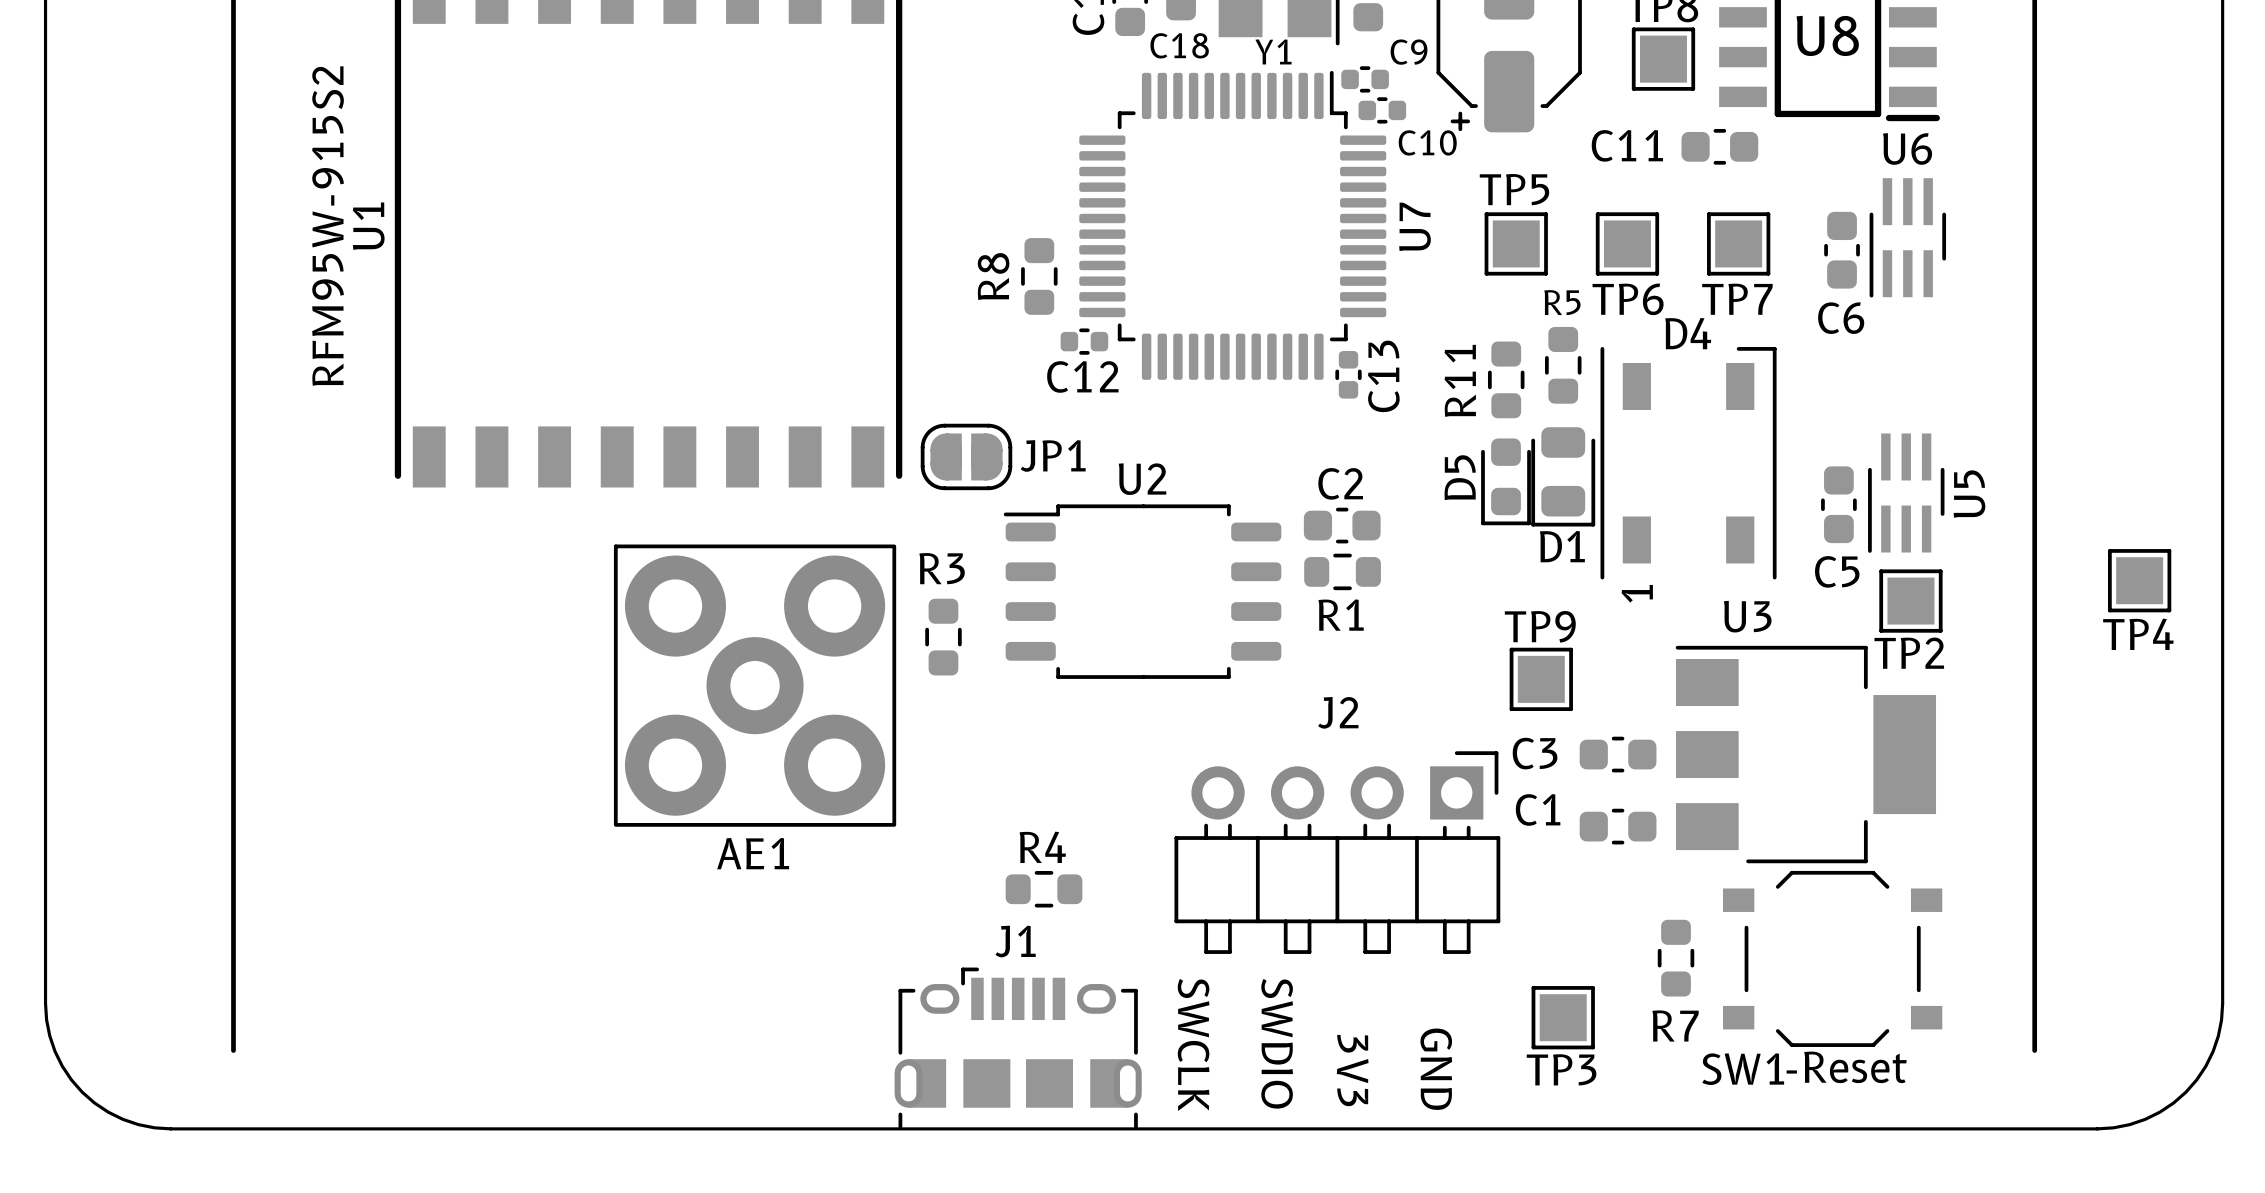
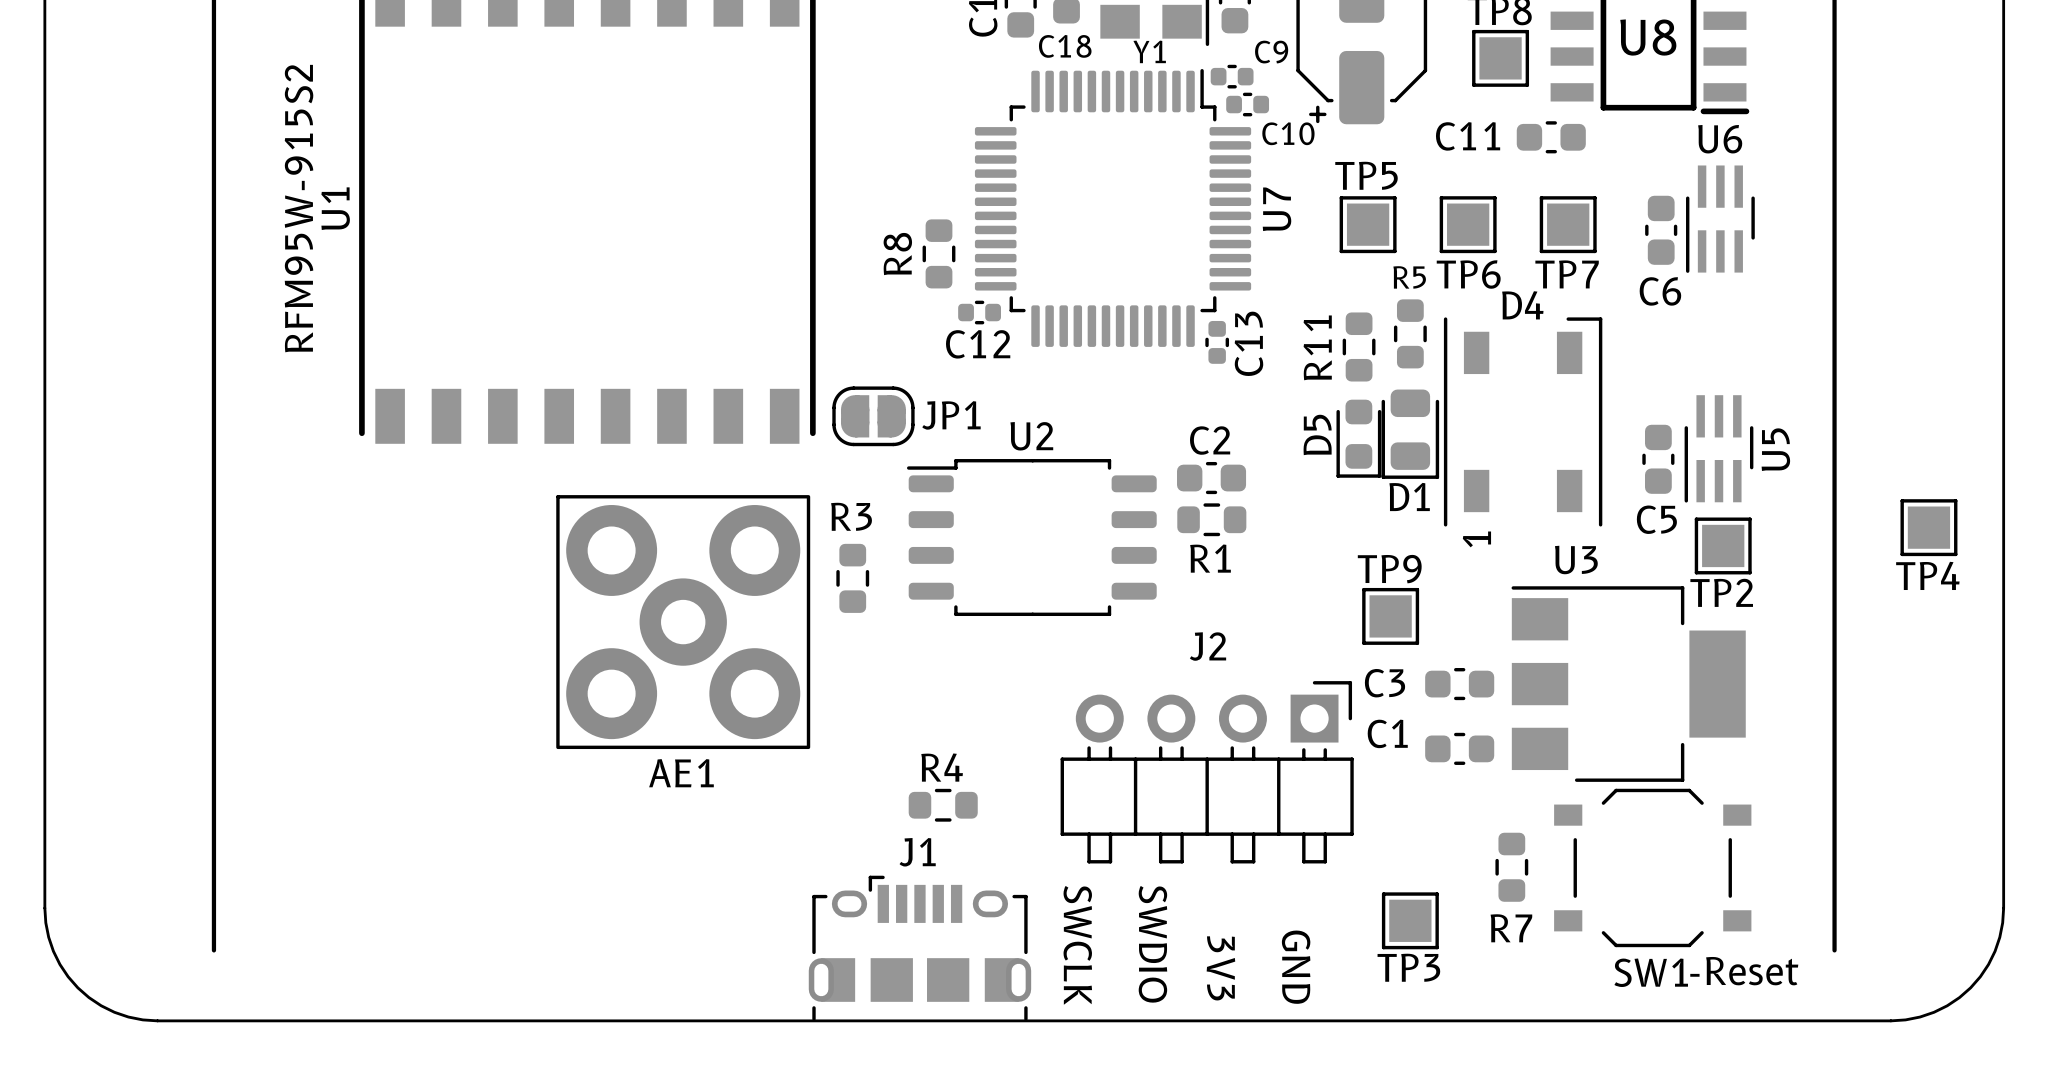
text position: -Reset (1846, 1067) -> -Reset (1744, 971)
SW1 name position: SW1 (1743, 1069) -> SW1 (1651, 972)

